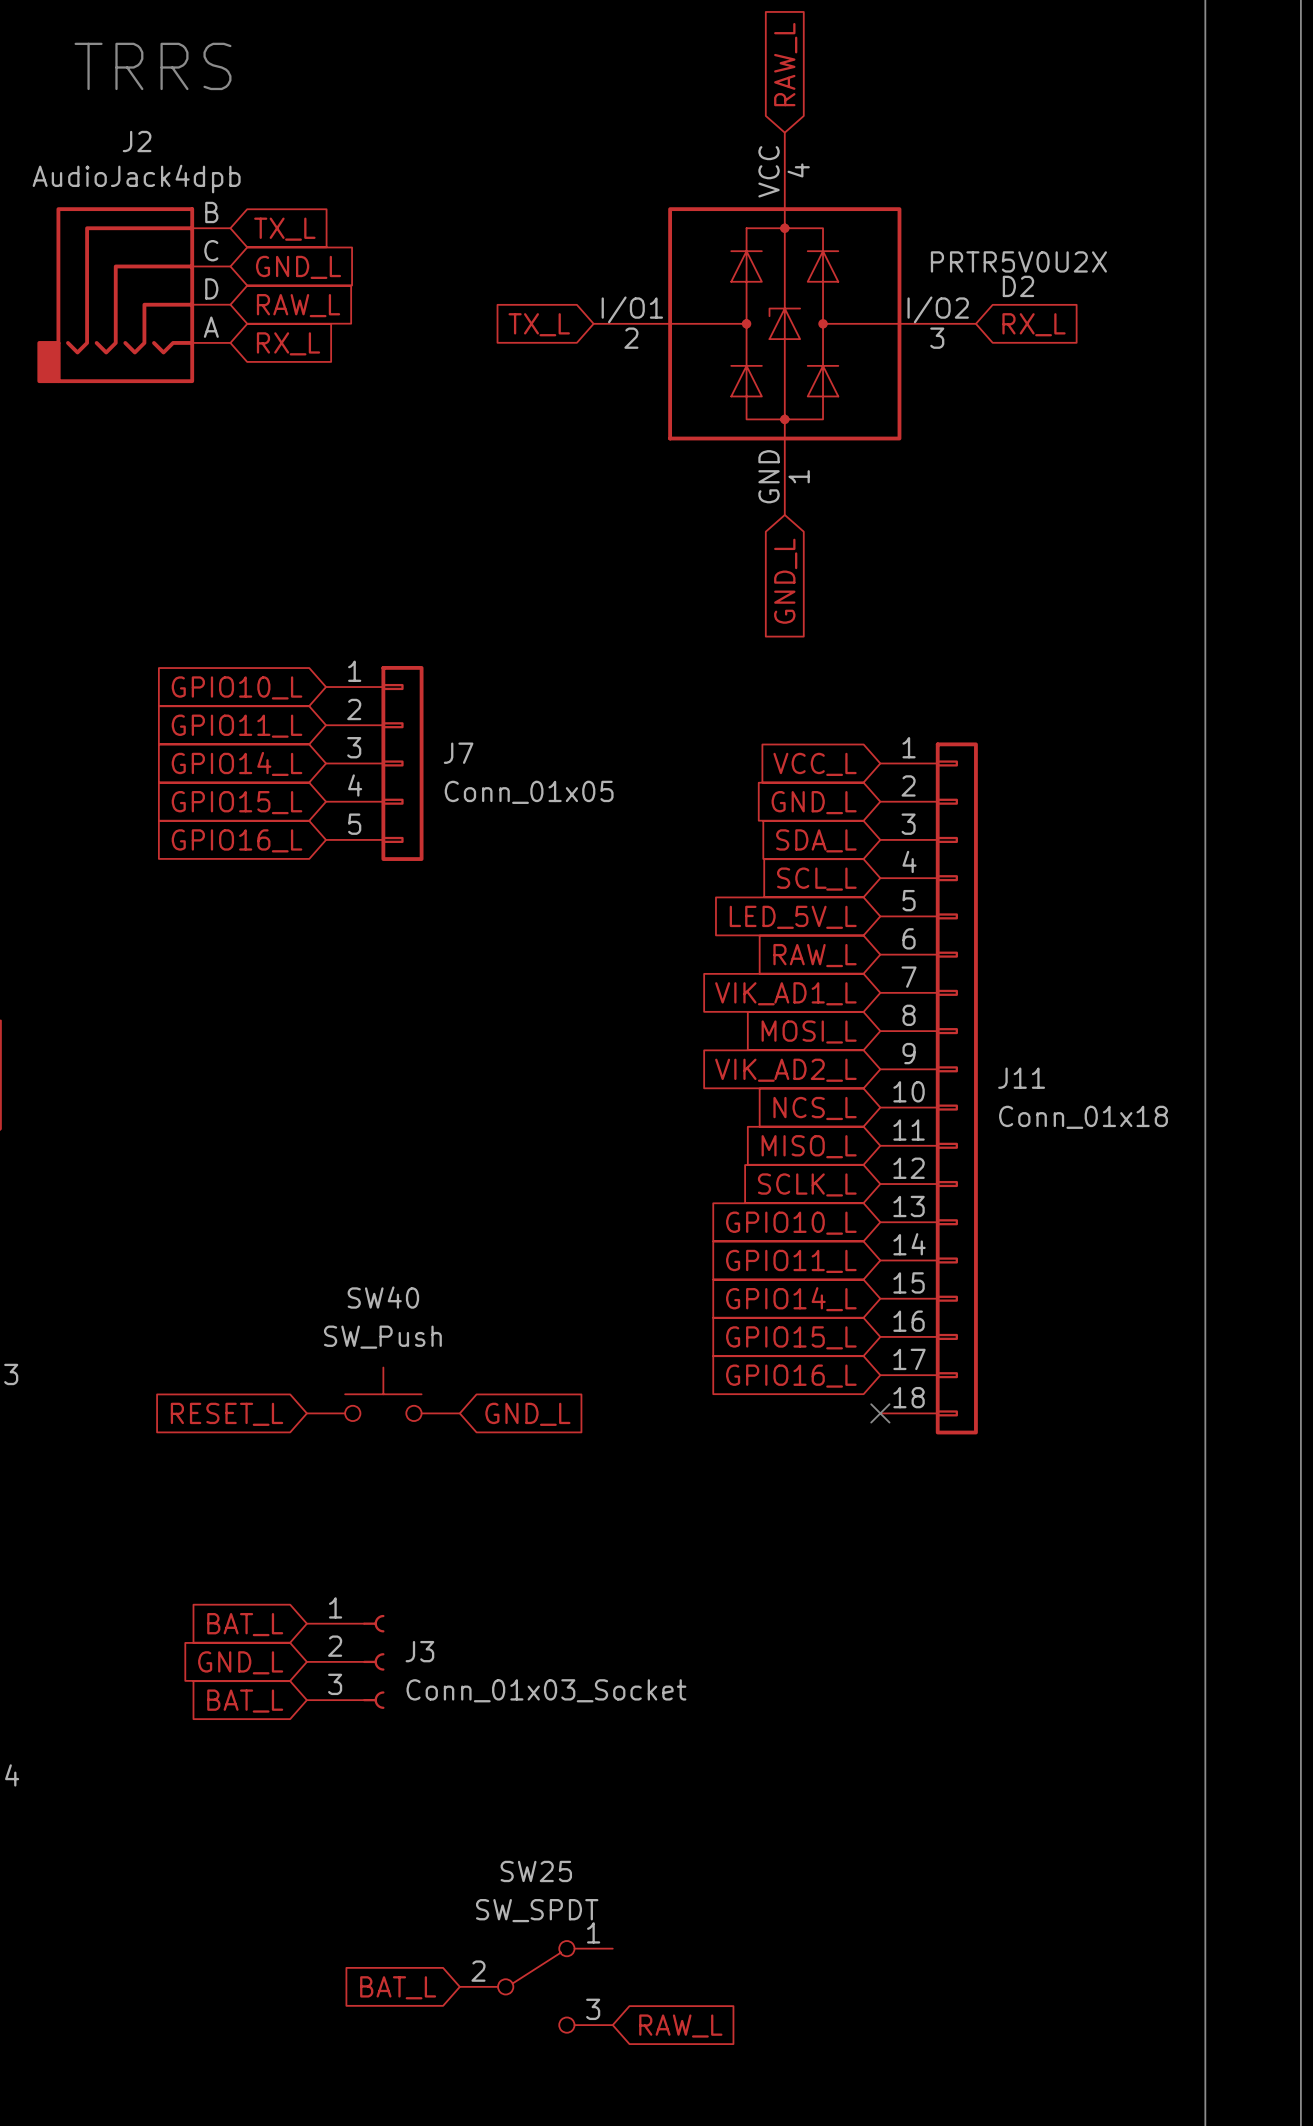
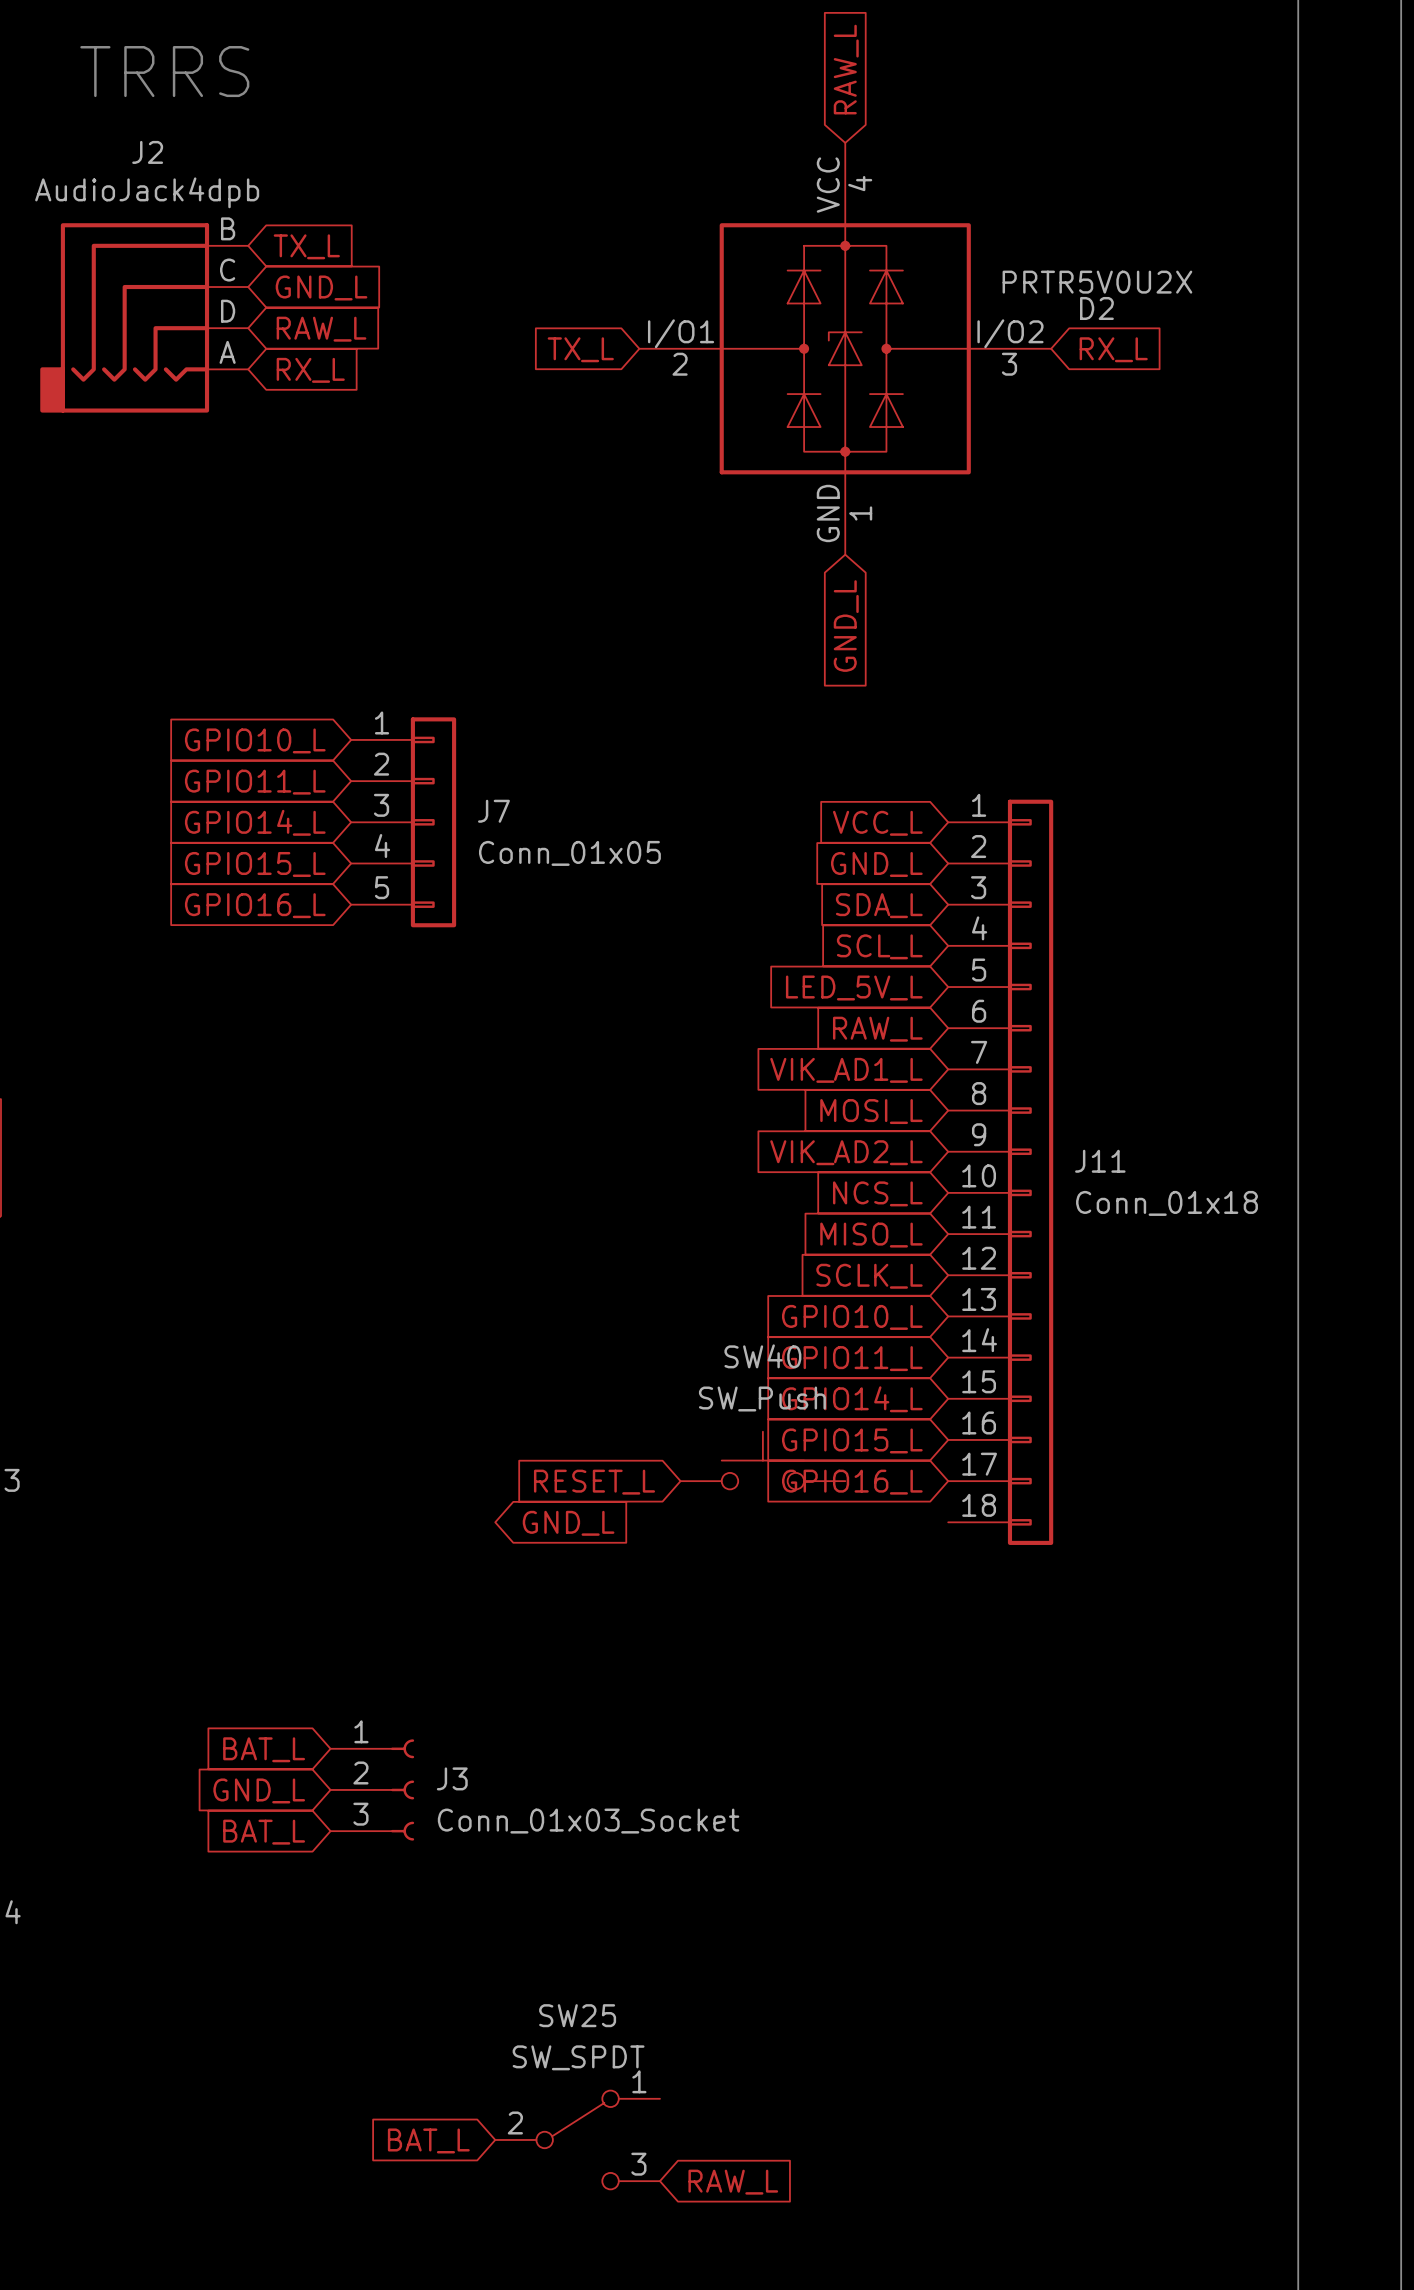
SW40 position: (383, 1394) -> (762, 1460)
no-connect mark: (880, 1413) -> none
global label position: RESET_L (227, 1414) -> RESET_L (594, 1482)

